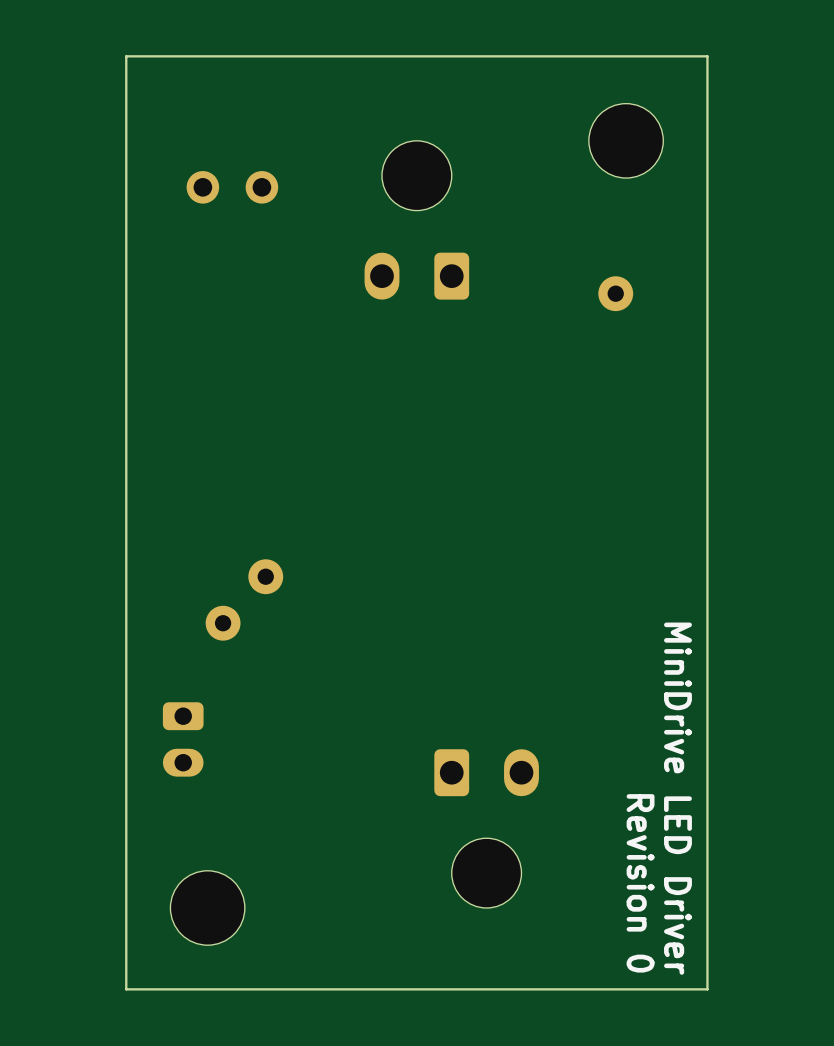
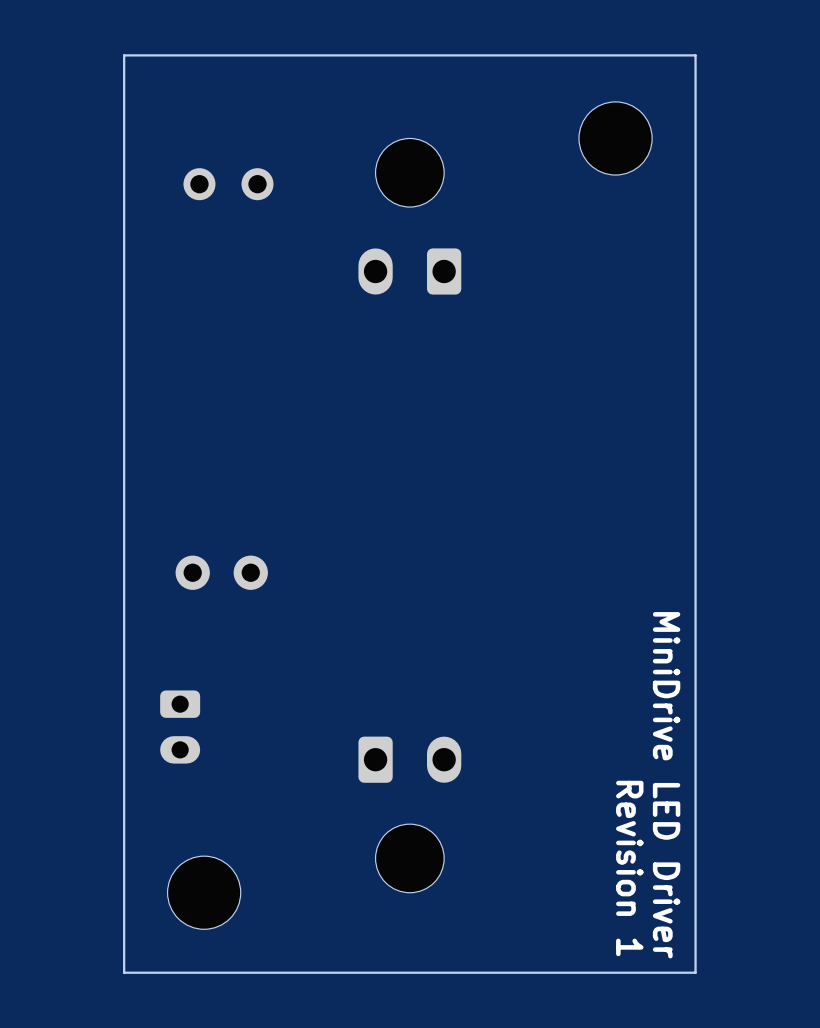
part: (615, 293) -> none
part footprint: [248, 559, 284, 595] -> [233, 555, 268, 590]
part: none -> (192, 572)
part: (223, 623) -> none
part position: (486, 828) -> (409, 814)
text: Revision 0 (640, 883) -> Revision 1 (629, 868)

